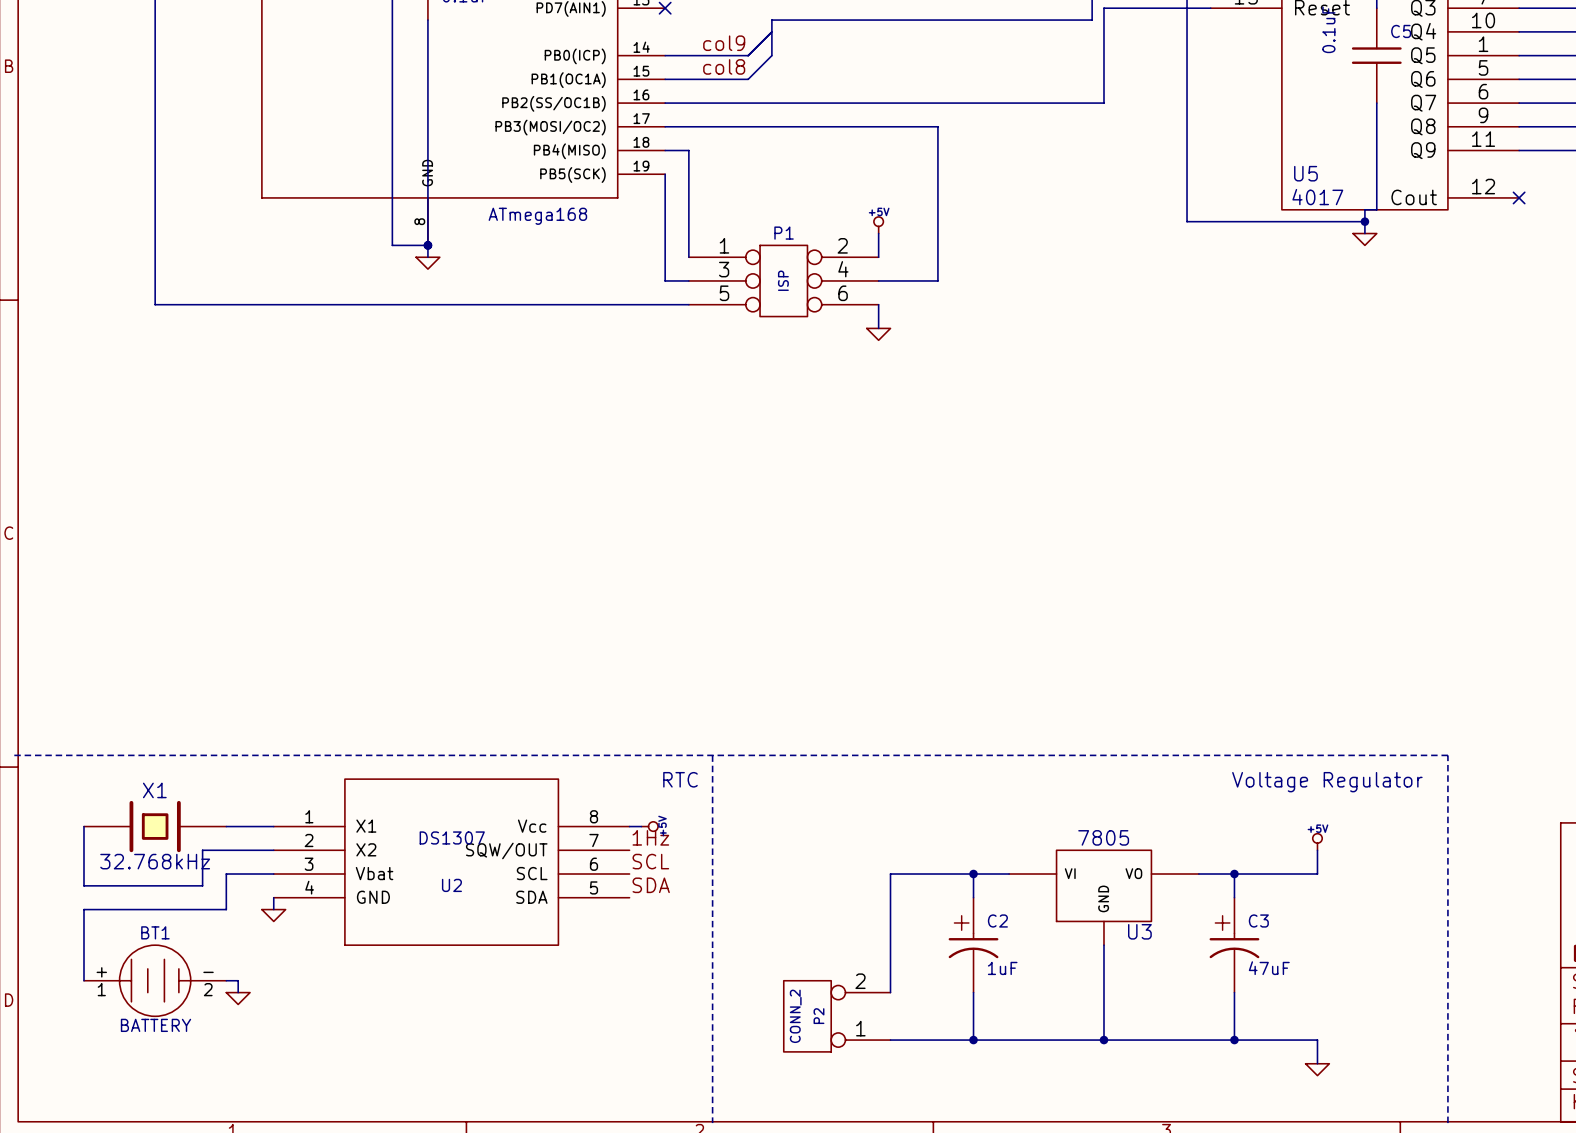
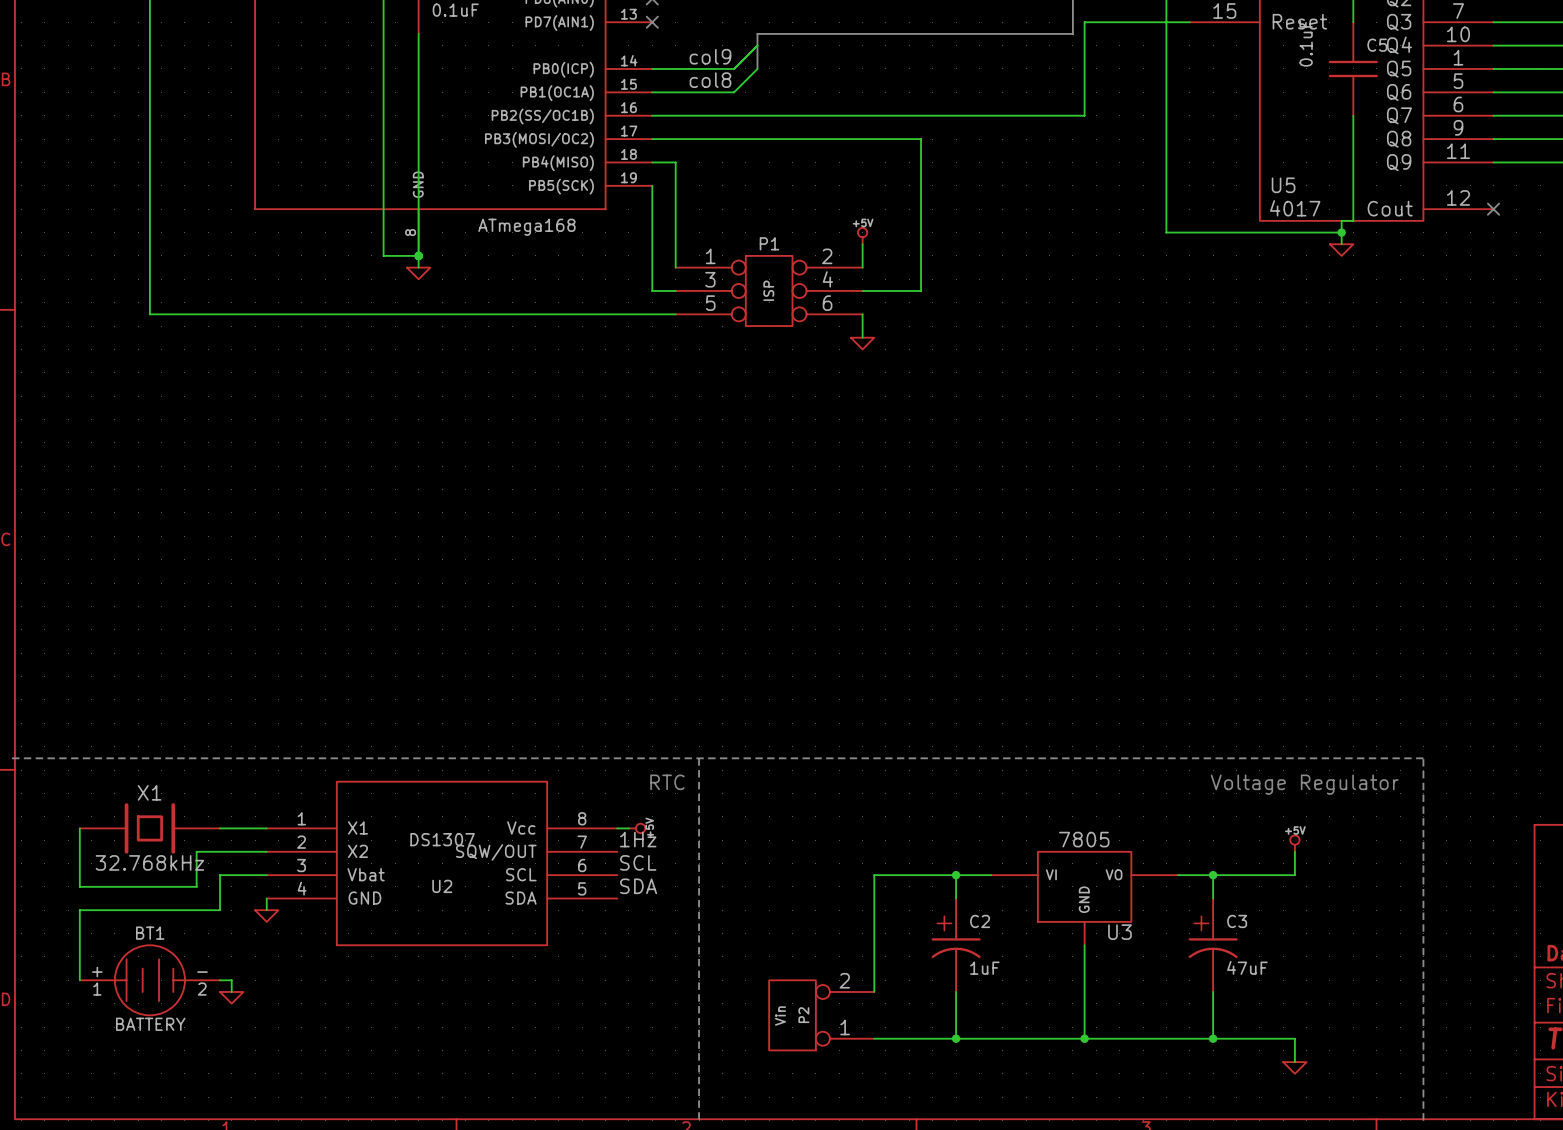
P2 value: CONN_2 (795, 1016) -> Vin (780, 1016)

